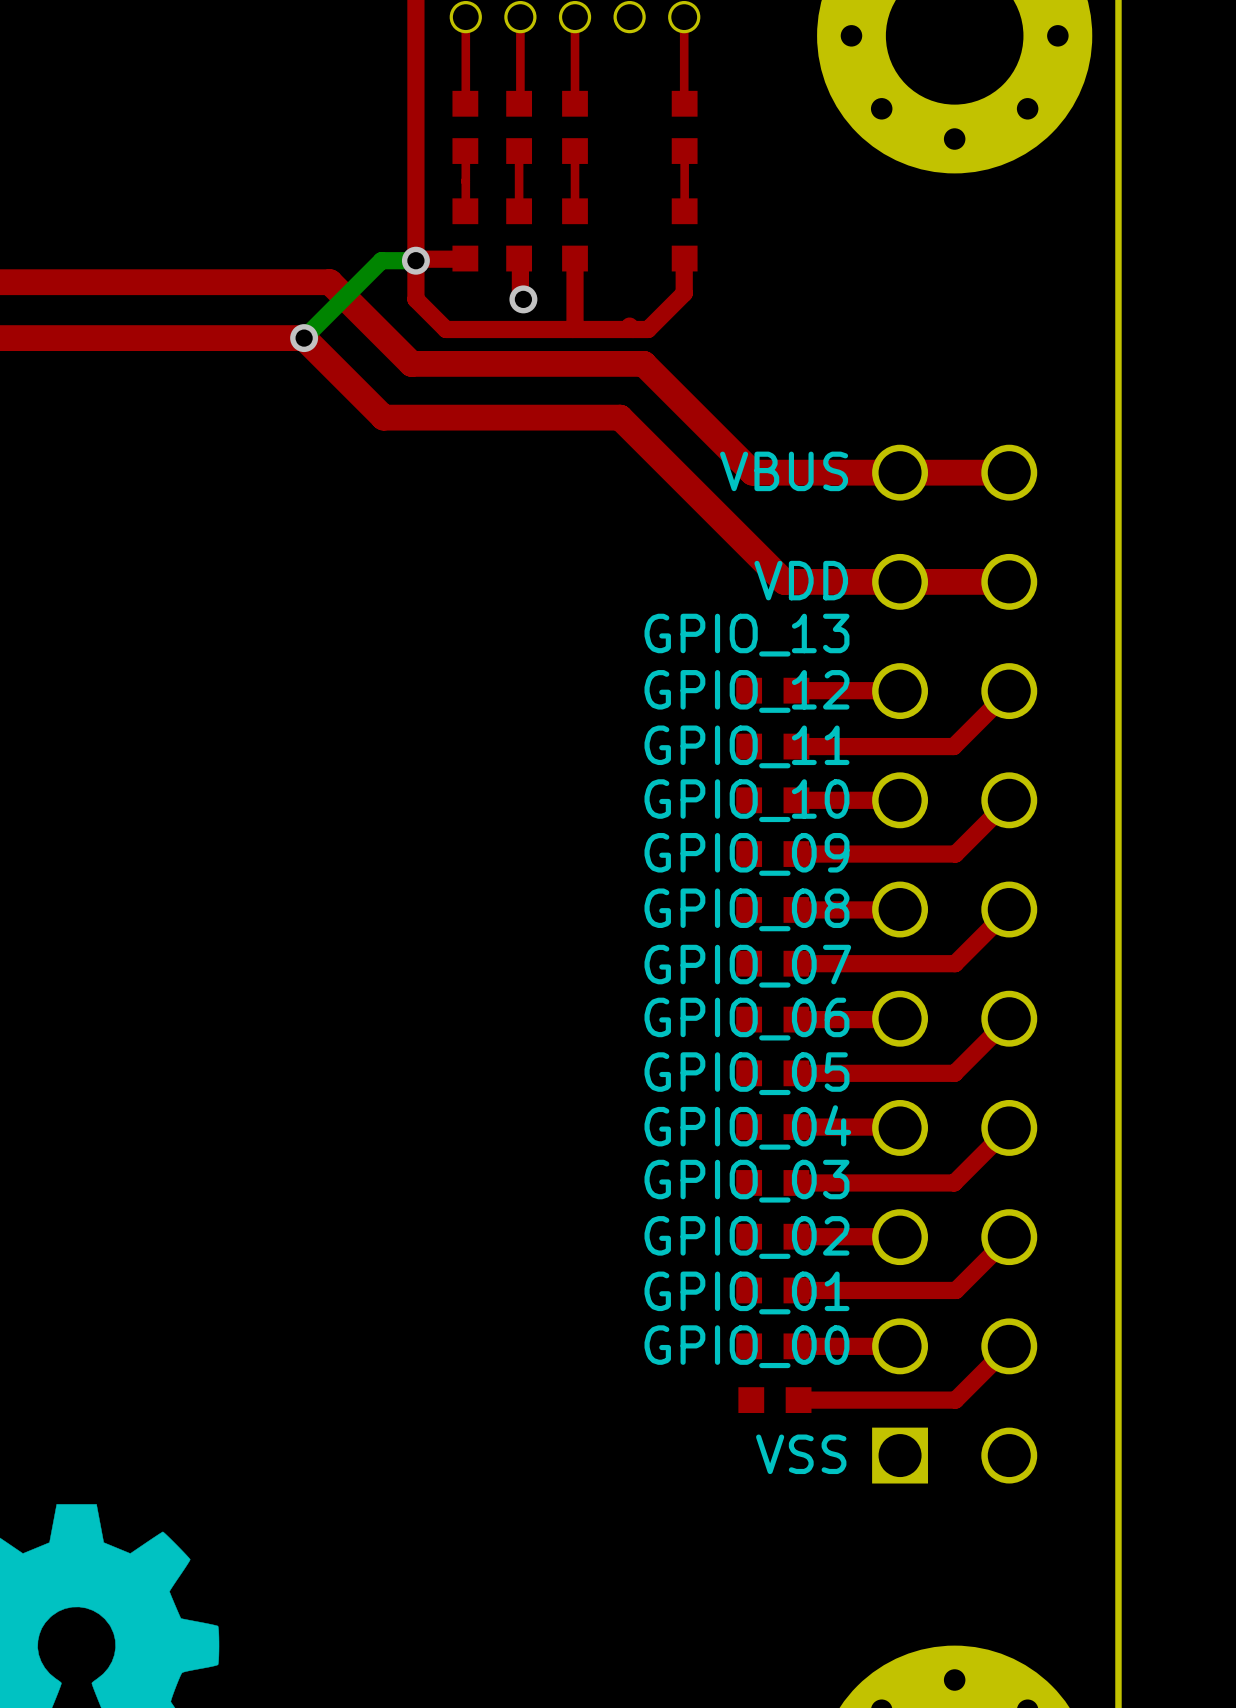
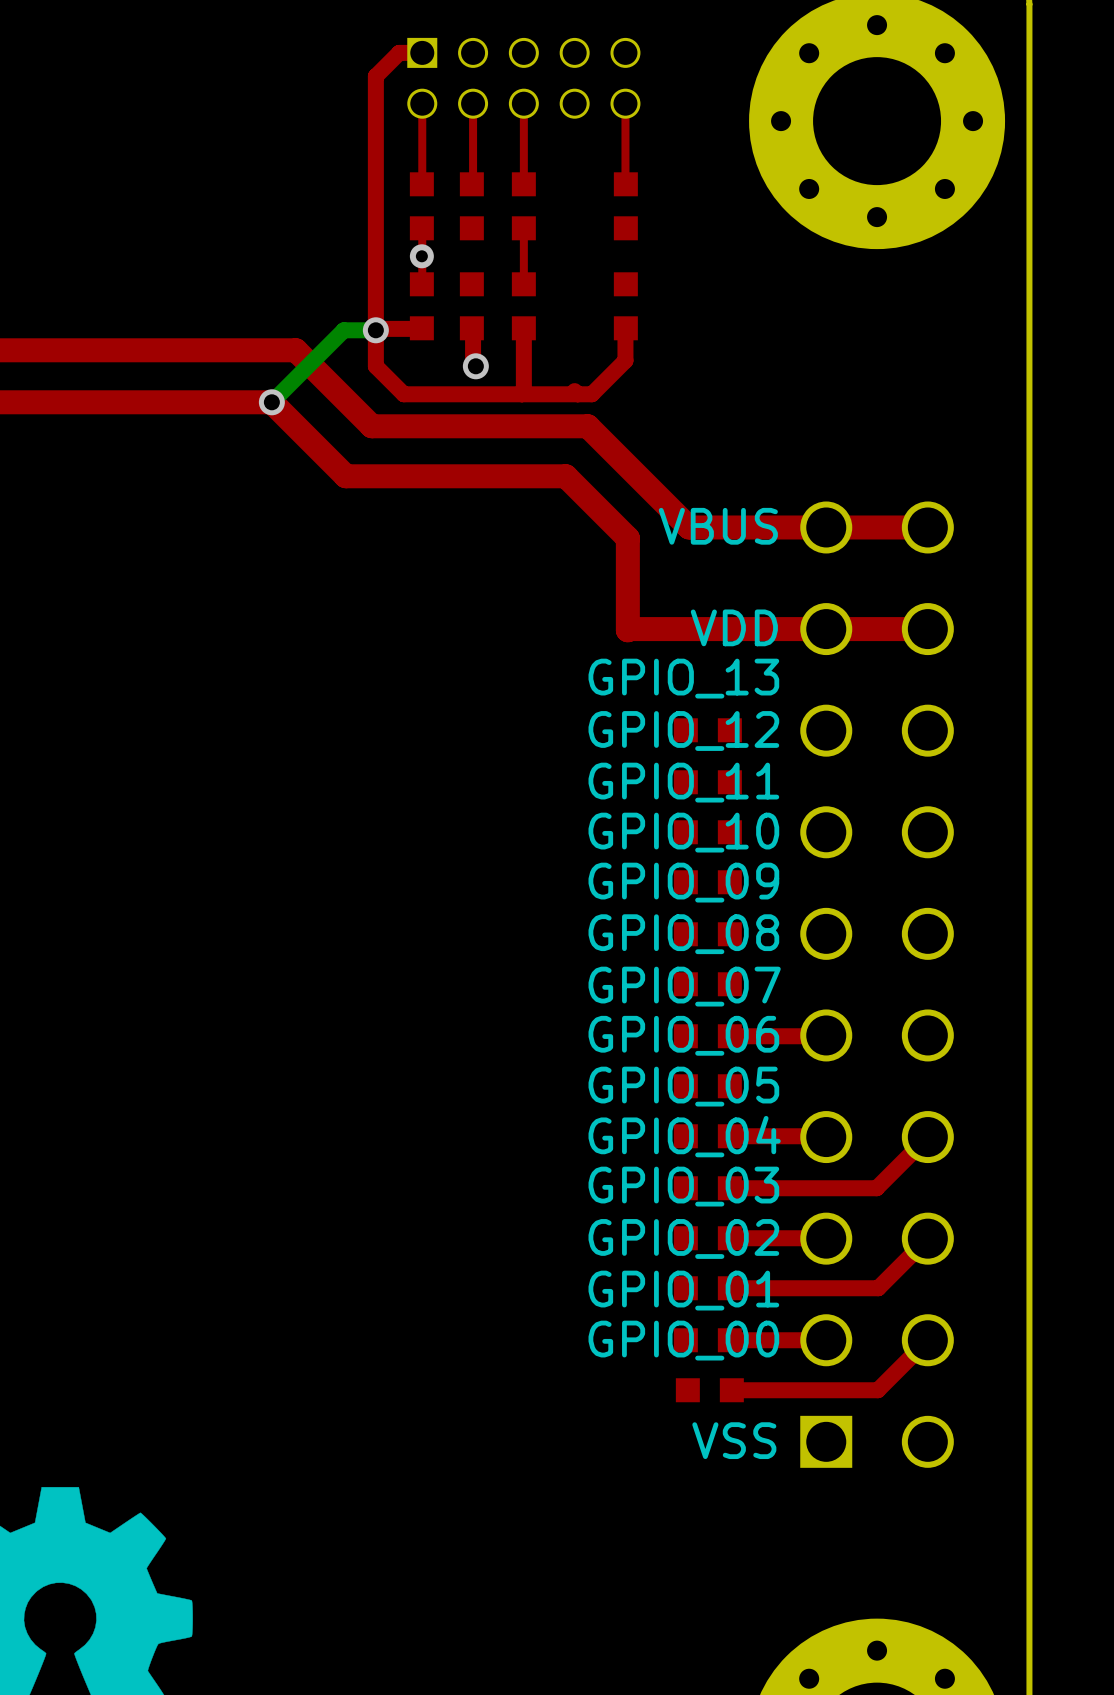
top track: (519, 151) (519, 211) -> none
top track: (684, 151) (684, 211) -> none
via: none -> (421, 256)
top track: (686, 484) (784, 581) -> (627, 538) (627, 630) (718, 629)
top track: (899, 690) (796, 690) -> none
top track: (1009, 691) (953, 746) (796, 746) -> none
top track: (900, 800) (796, 800) -> none
top track: (1009, 800) (955, 854) (796, 854) -> none
top track: (899, 909) (796, 909) -> none
top track: (1009, 909) (955, 963) (796, 963) -> none
top track: (1009, 1018) (954, 1073) (796, 1073) -> none

